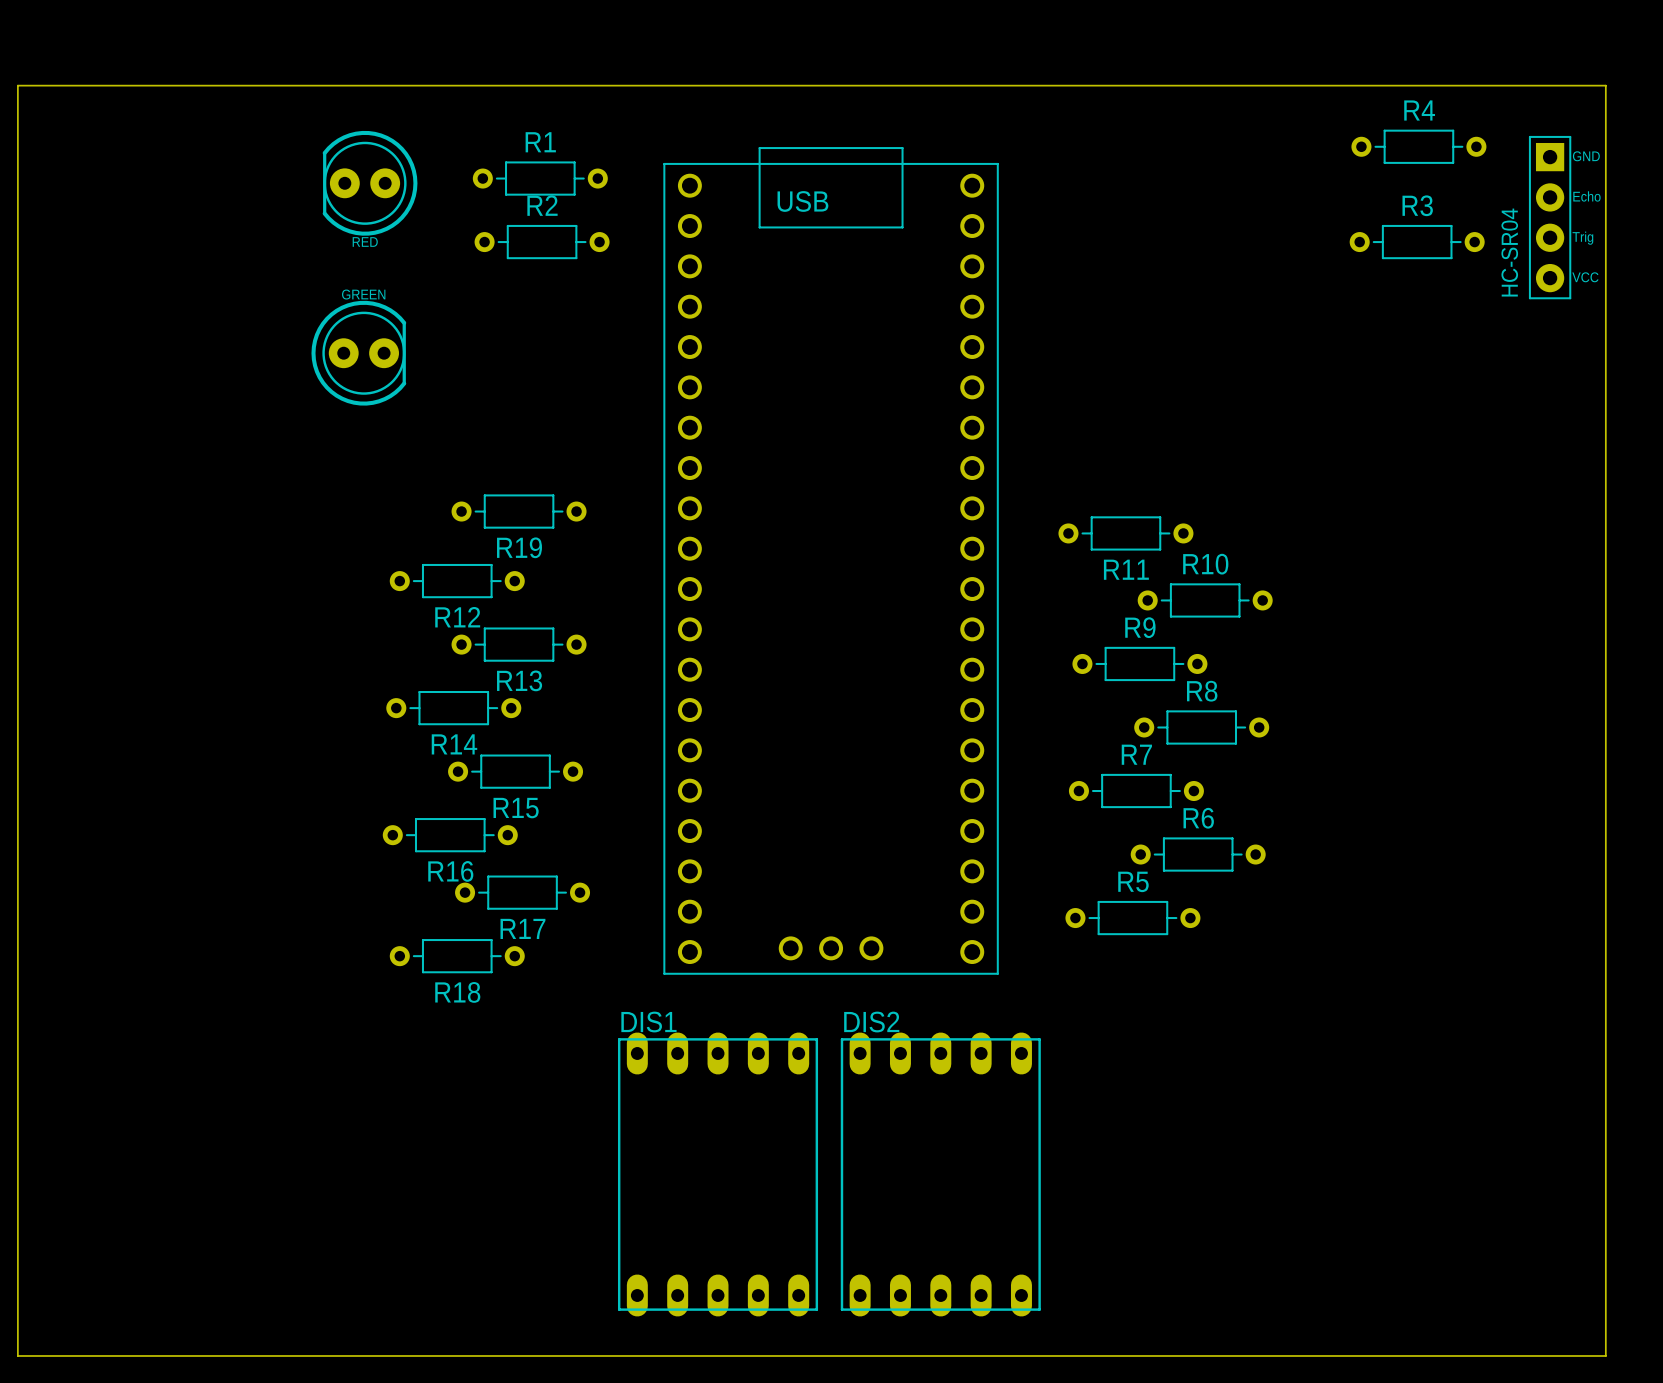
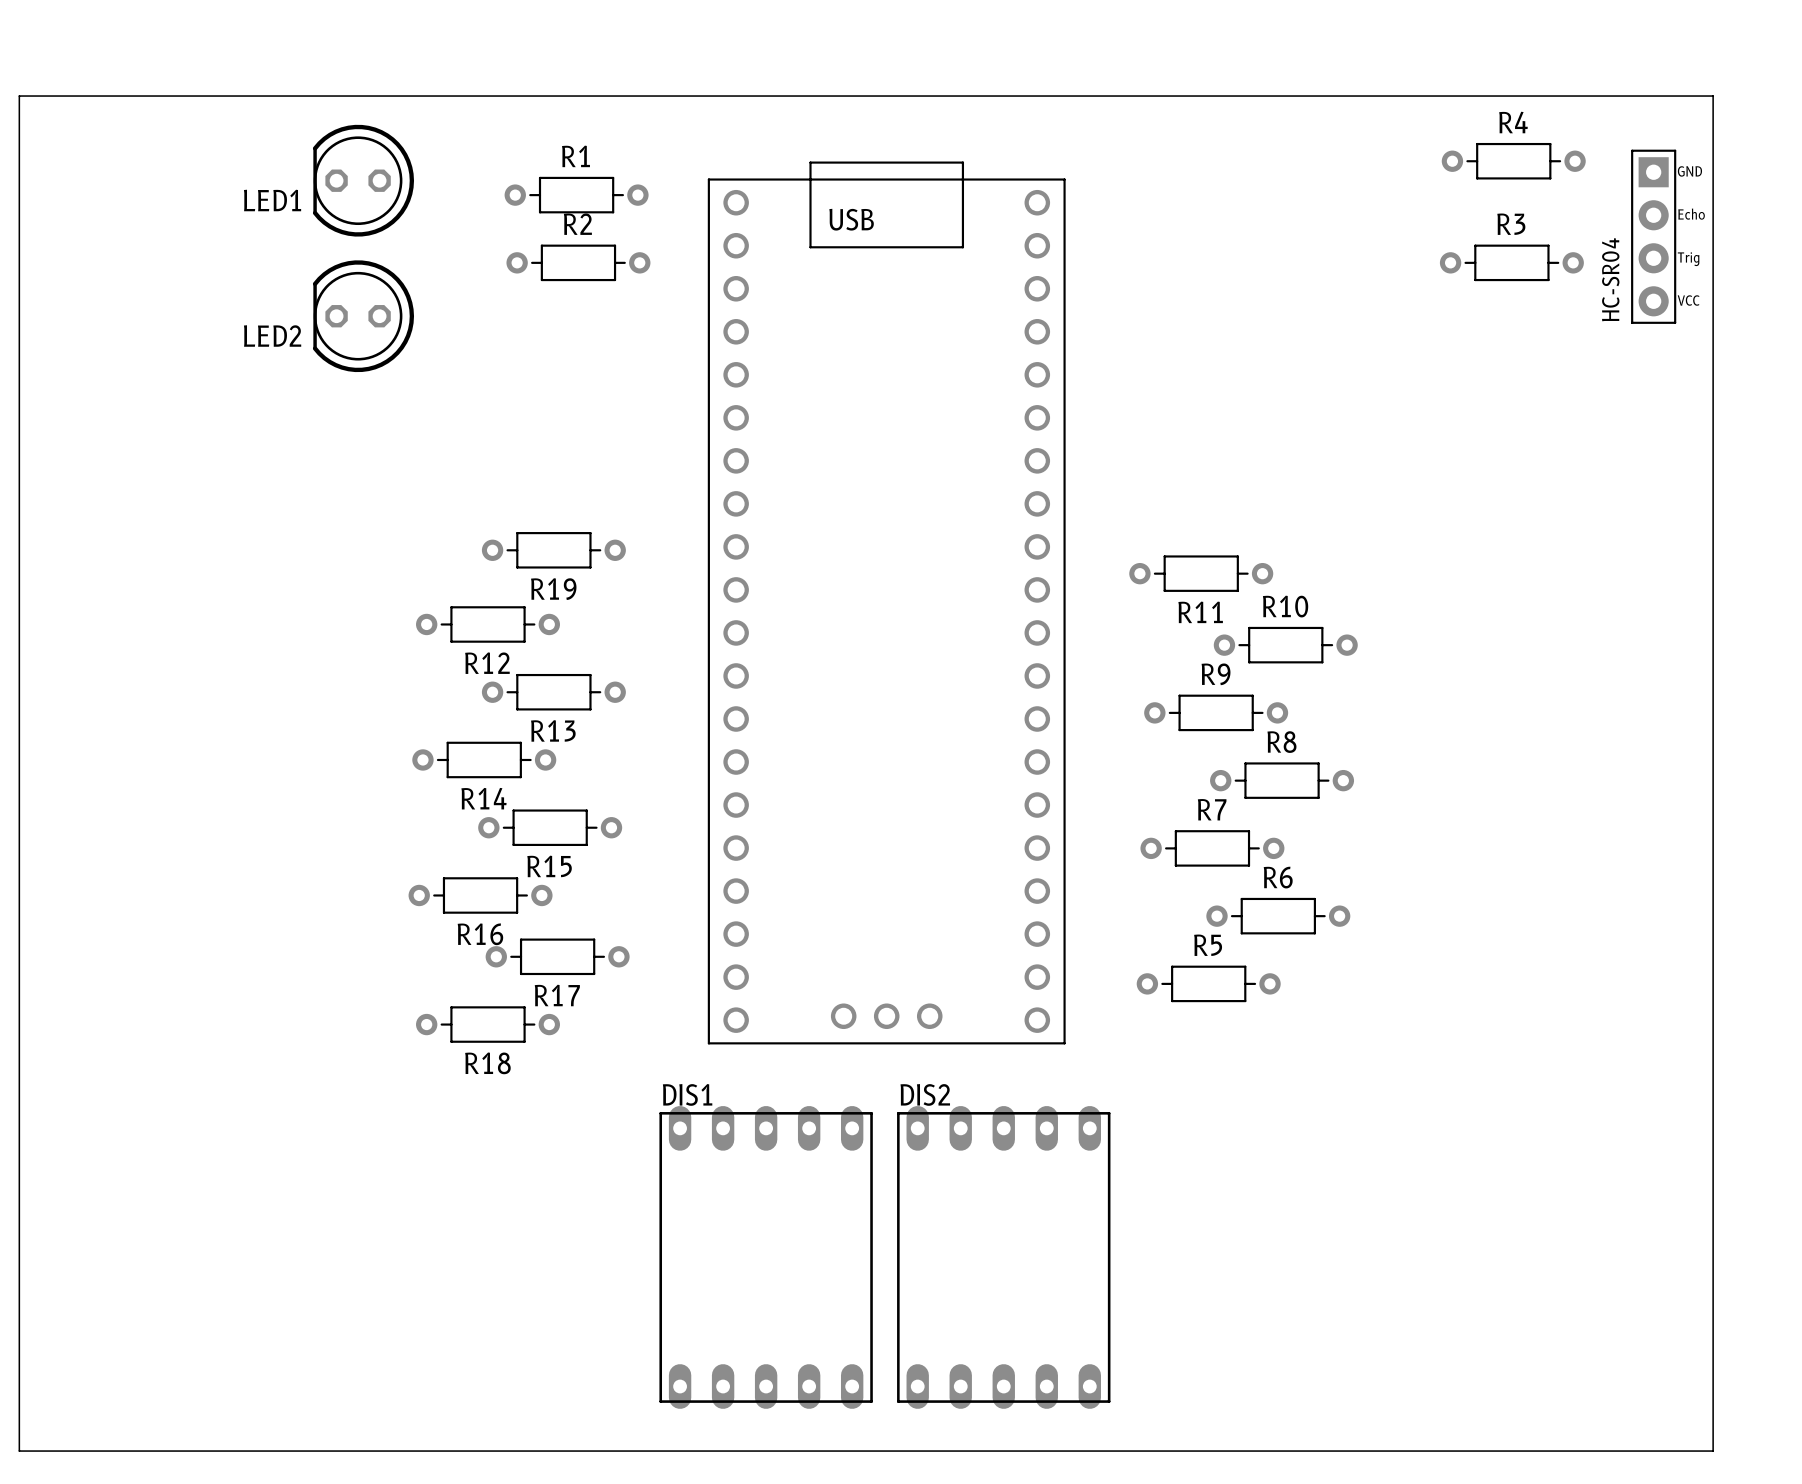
LED1: none -> (363, 180)
RED: (370, 183) -> none
LED2: none -> (363, 316)
GREEN: (358, 353) -> none

